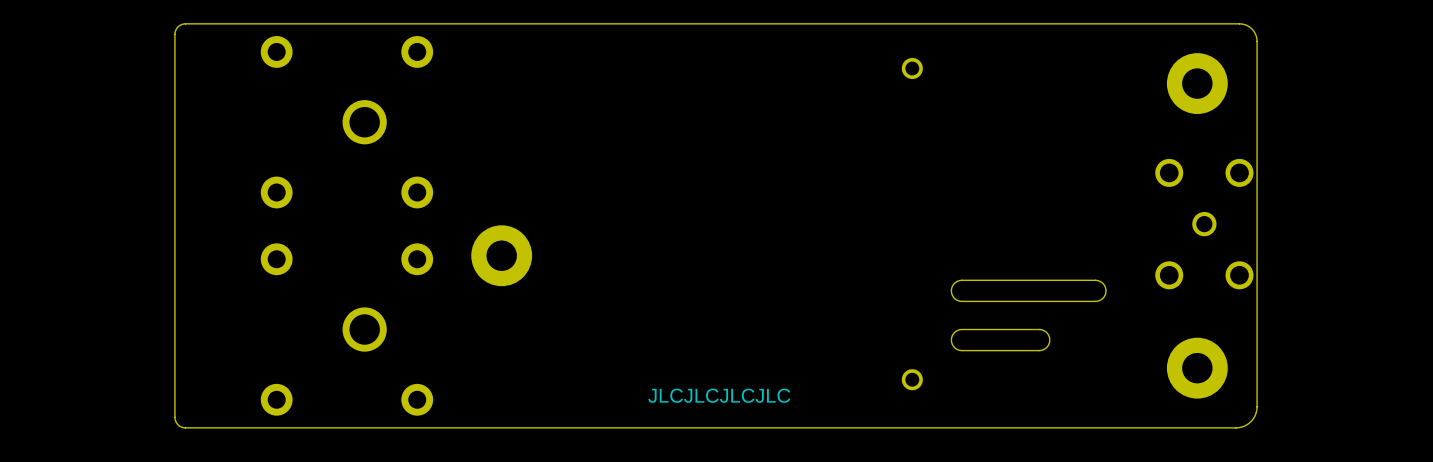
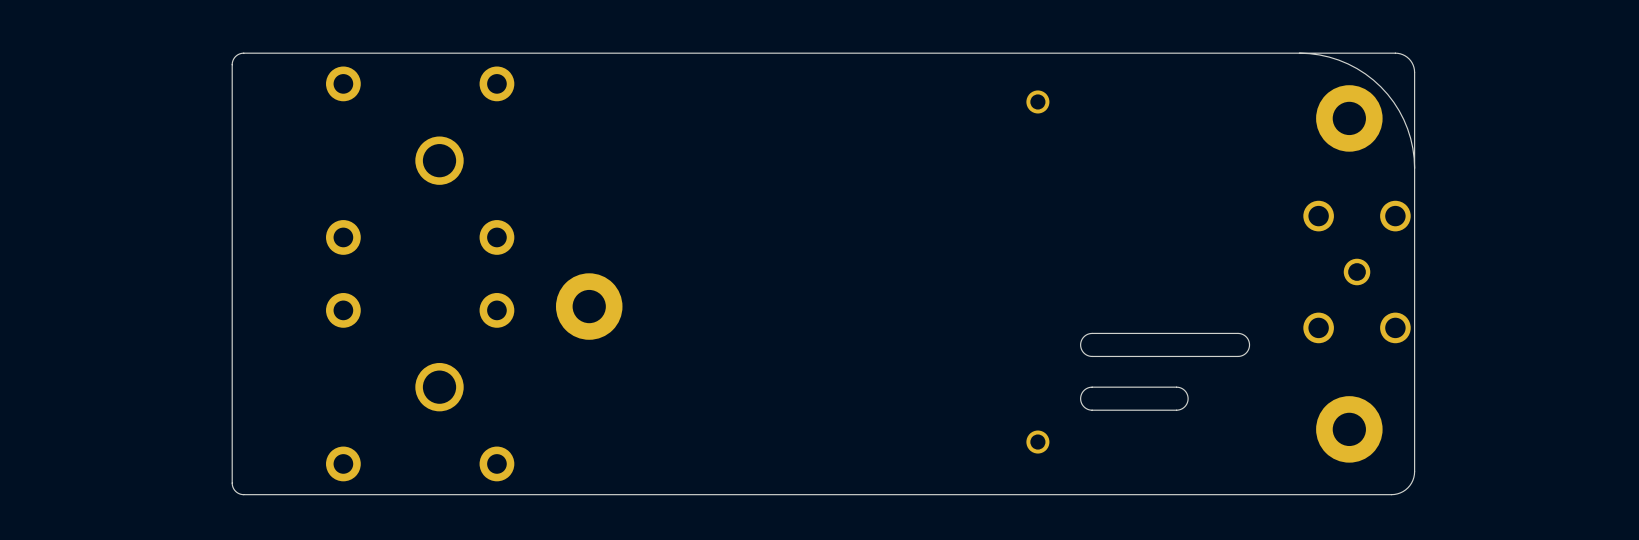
board edge: none -> (1299, 53) (1319, 54) (1338, 60) (1357, 68) (1380, 86) (1399, 110) (1407, 128) (1412, 148) (1414, 168)
text: JLCJLCJLCJLC (719, 395) -> none

